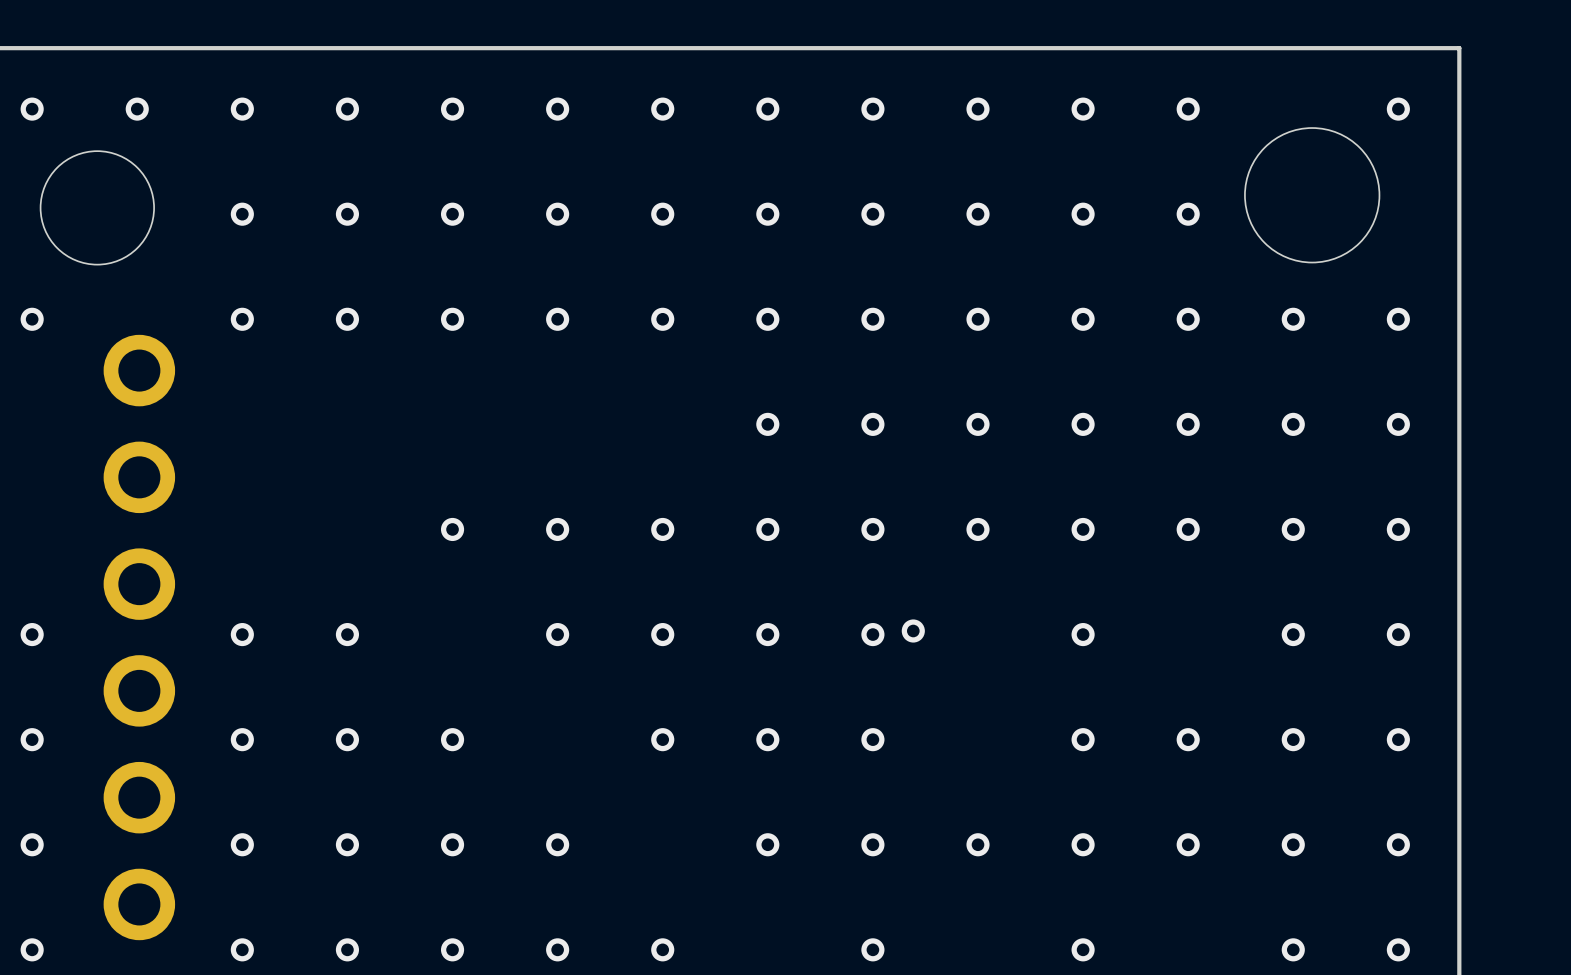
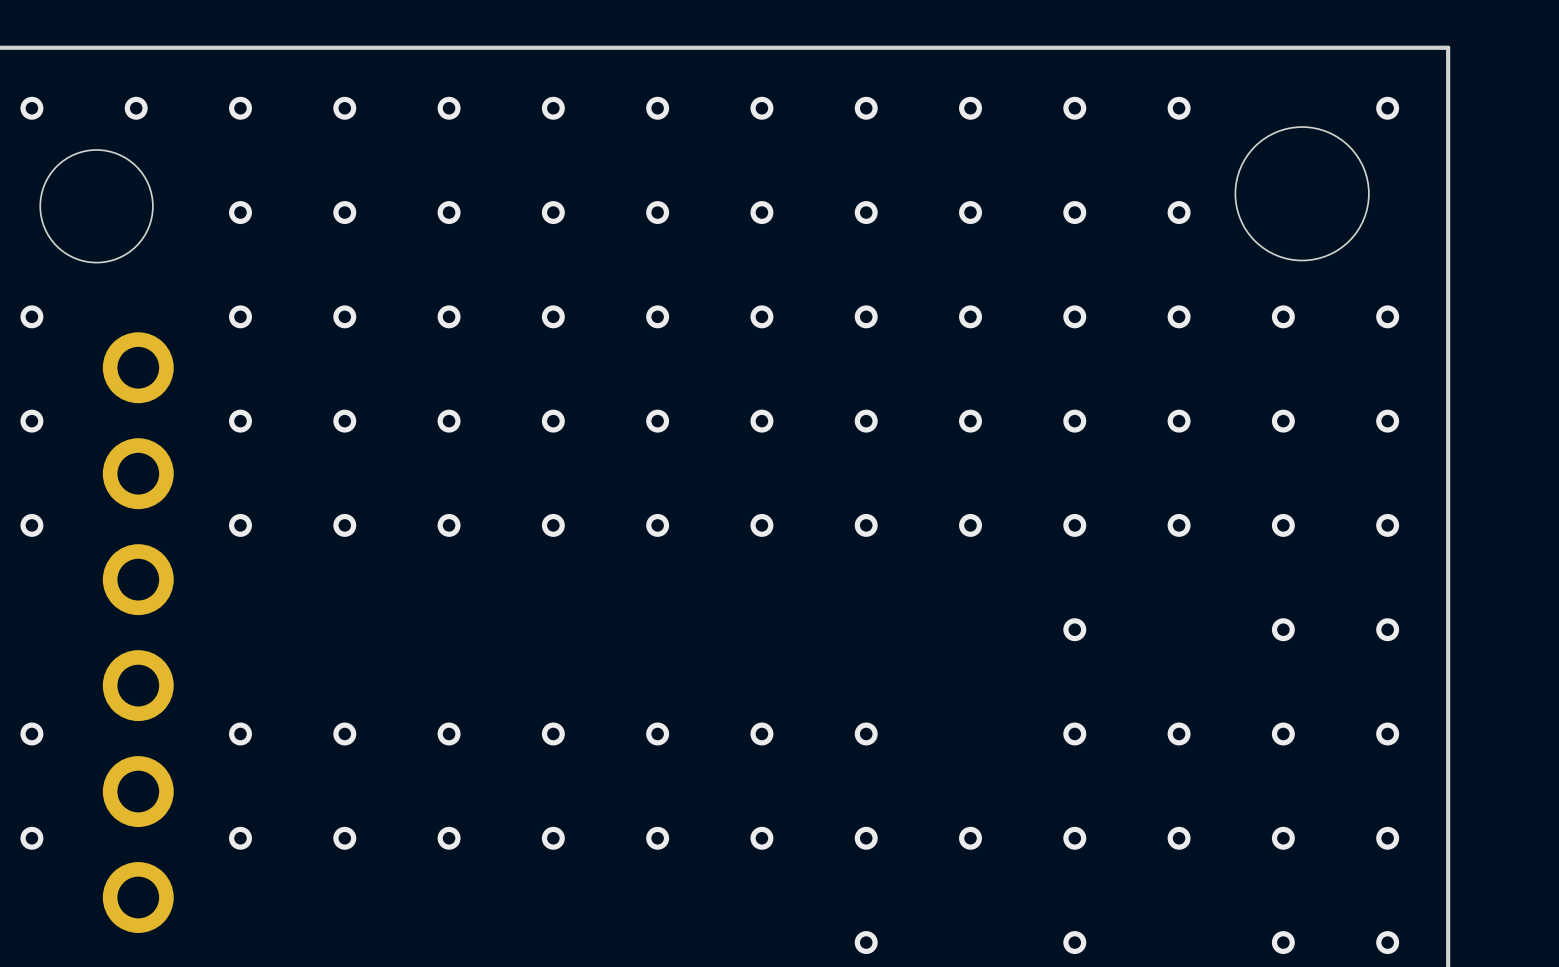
via: none -> (31, 421)
via: none -> (240, 421)
via: none -> (344, 421)
via: none -> (449, 421)
via: none -> (553, 421)
via: none -> (657, 421)
via: none -> (31, 525)
via: none -> (240, 525)
via: none -> (344, 525)
via: (913, 631) -> none
via: (32, 634) -> none
via: (242, 634) -> none
via: (347, 634) -> none
via: (557, 634) -> none
via: (662, 634) -> none
via: (767, 634) -> none
via: (872, 634) -> none
via: none -> (553, 733)
via: none -> (657, 838)
via: (32, 949) -> none
via: (242, 949) -> none
via: (347, 949) -> none
via: (452, 949) -> none
via: (557, 949) -> none
via: (662, 949) -> none

